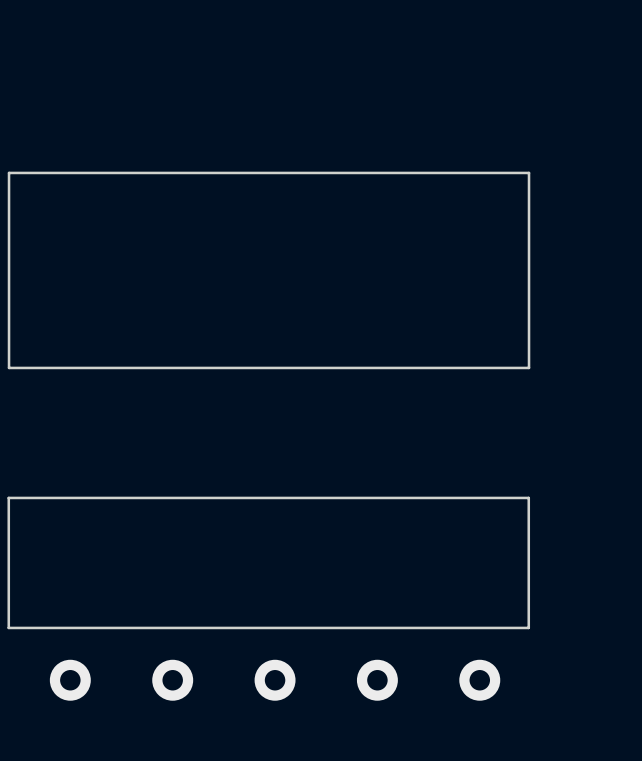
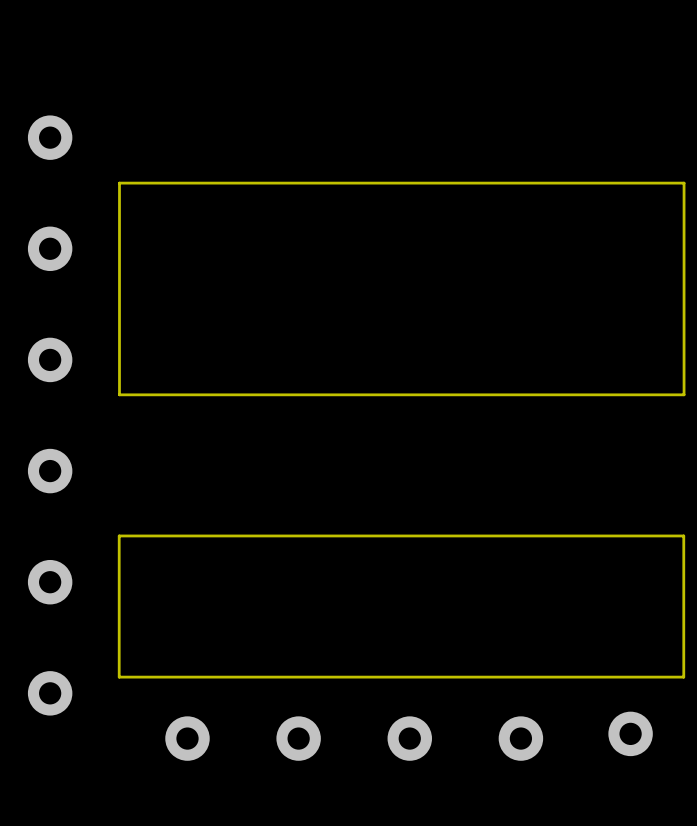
via: none -> (50, 137)
board edge: (529, 172) (529, 367) (9, 367) (9, 172) (529, 172) -> (684, 183) (684, 394) (119, 394) (119, 183) (684, 183)
via: none -> (50, 248)
via: none -> (50, 359)
via: none -> (50, 471)
board edge: (528, 497) (528, 627) (8, 627) (8, 497) (528, 497) -> (683, 535) (683, 677) (119, 677) (119, 535) (683, 535)
via: none -> (50, 582)
via: none -> (630, 733)
via position: (70, 680) -> (50, 693)

